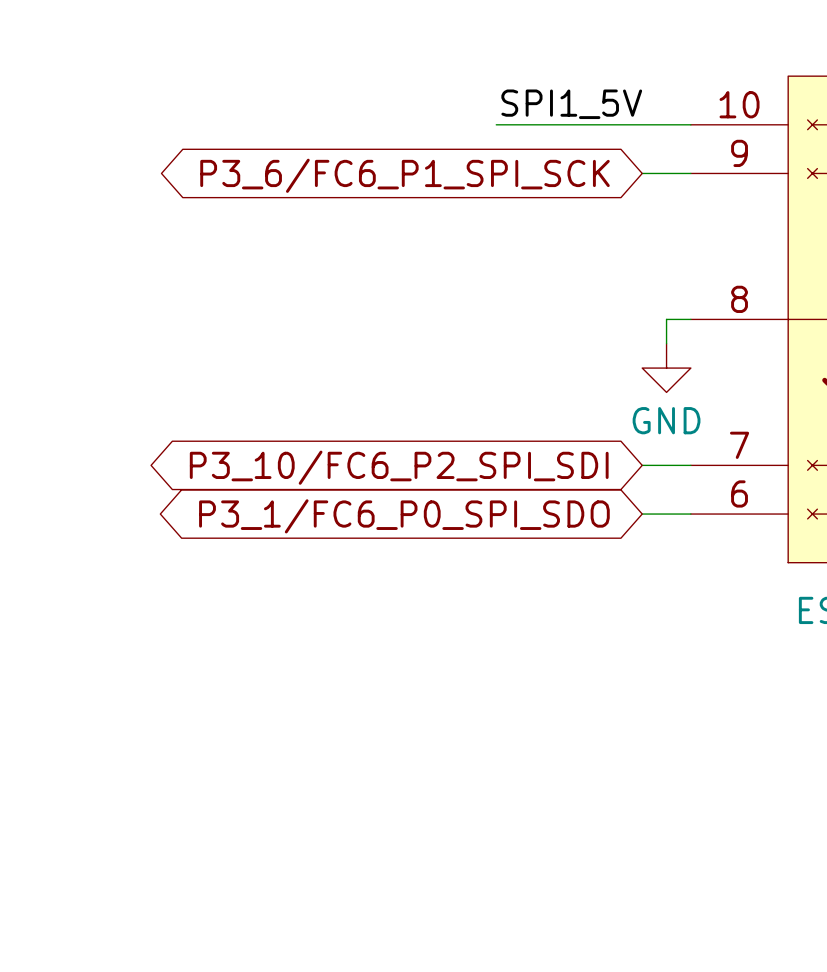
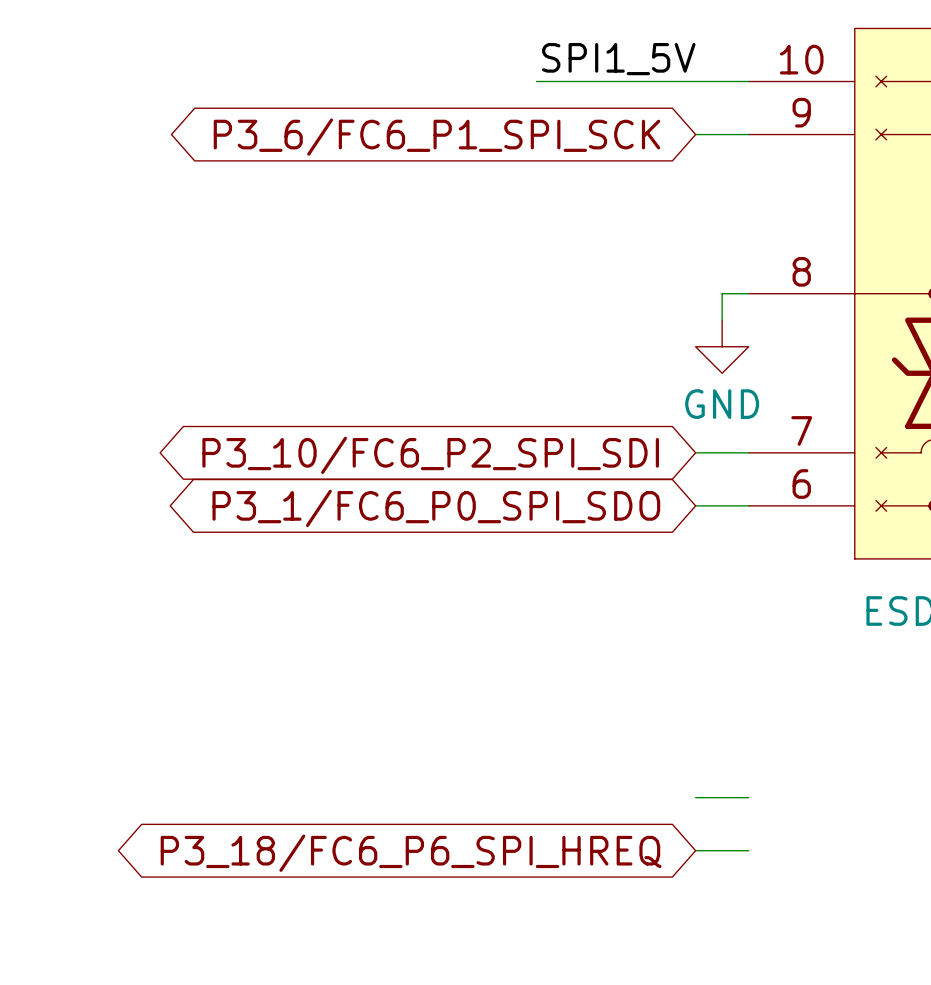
wire: none -> (695, 797) (748, 797)
wire: none -> (695, 850) (748, 850)
global label: none -> P3_18/FC6_P6_SPI_HREQ (411, 853)

